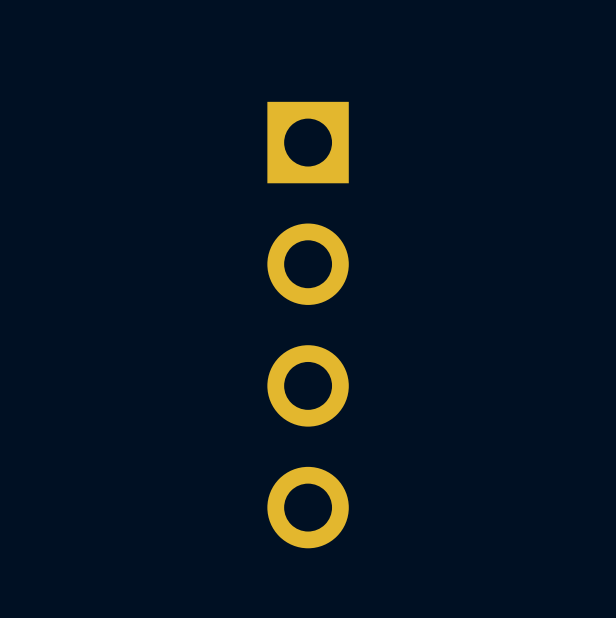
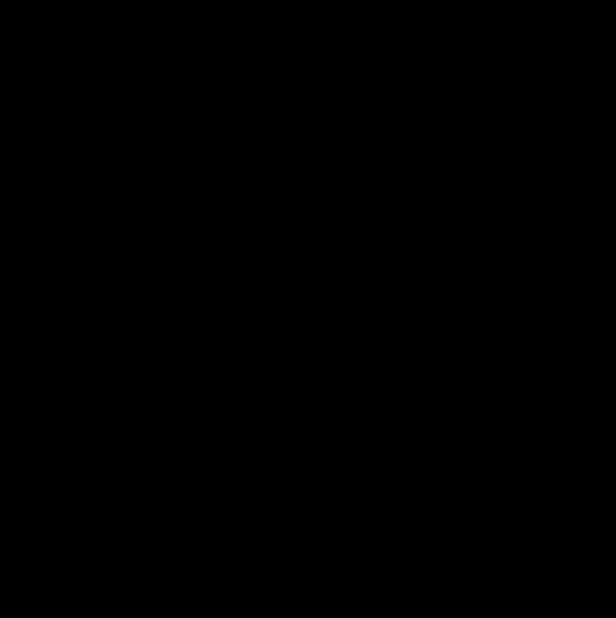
part: (308, 325) -> none

